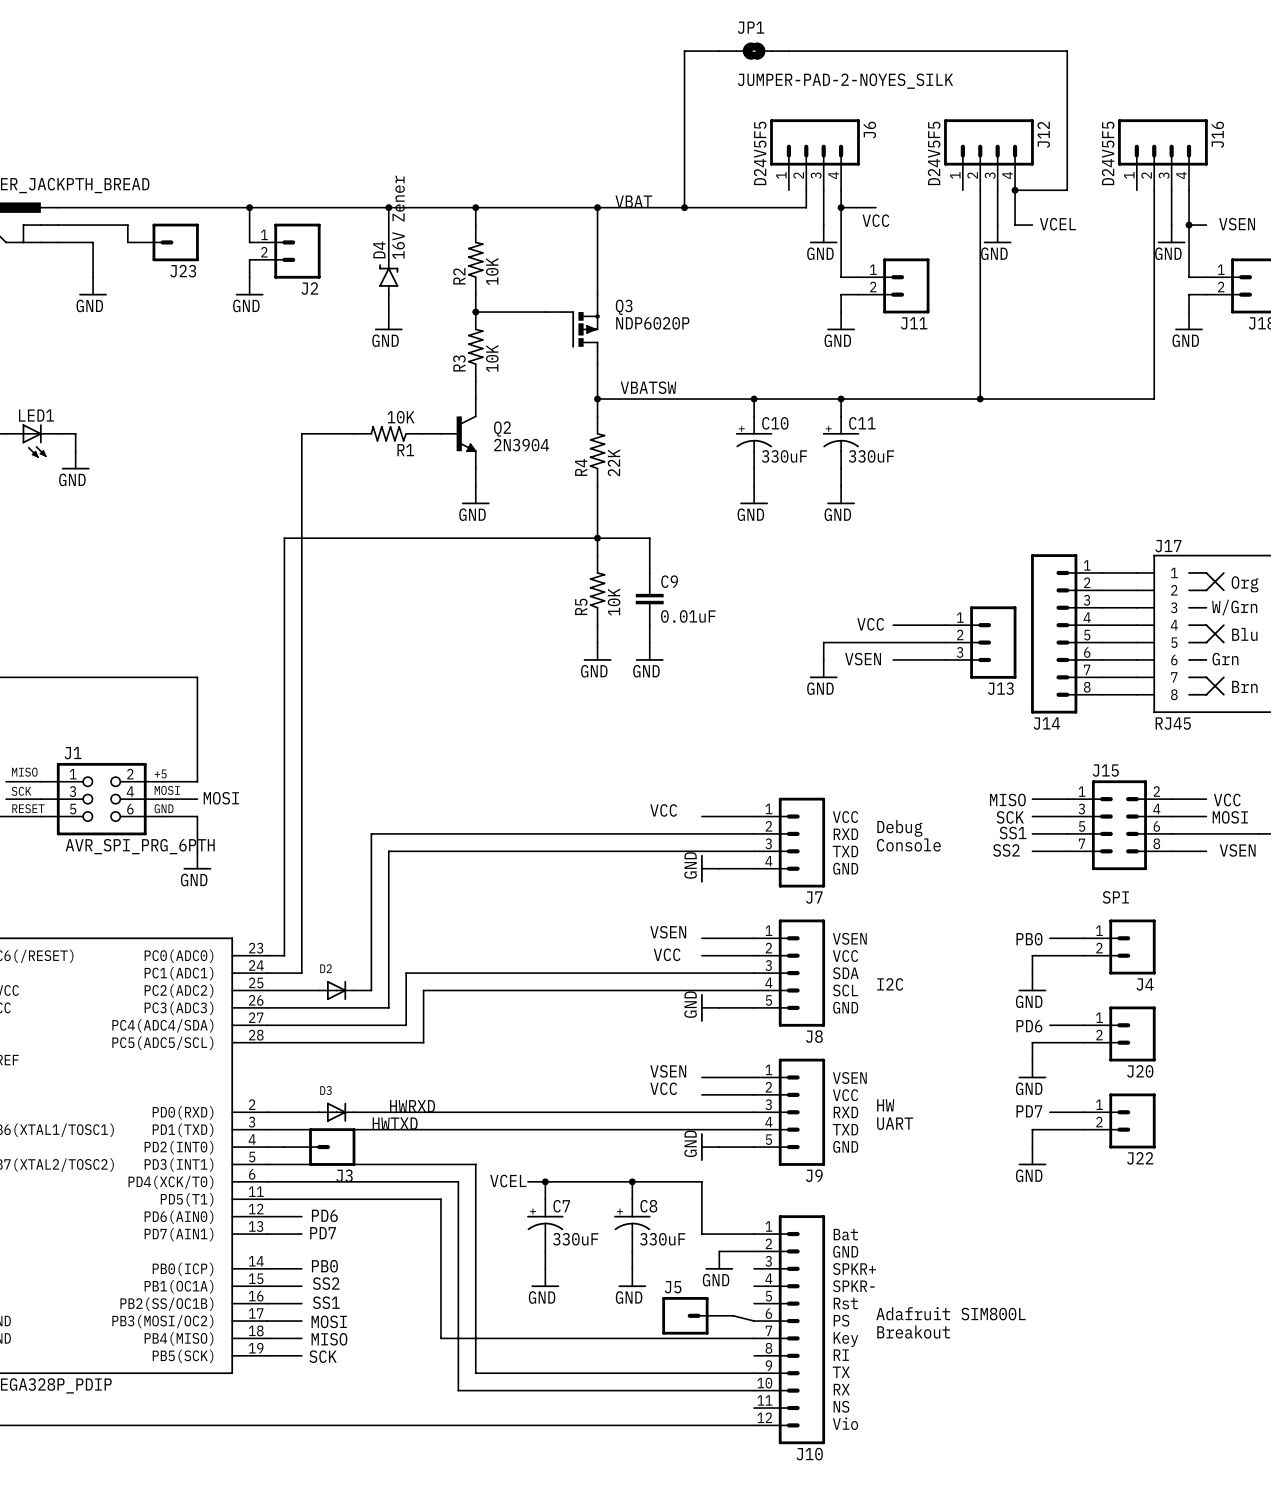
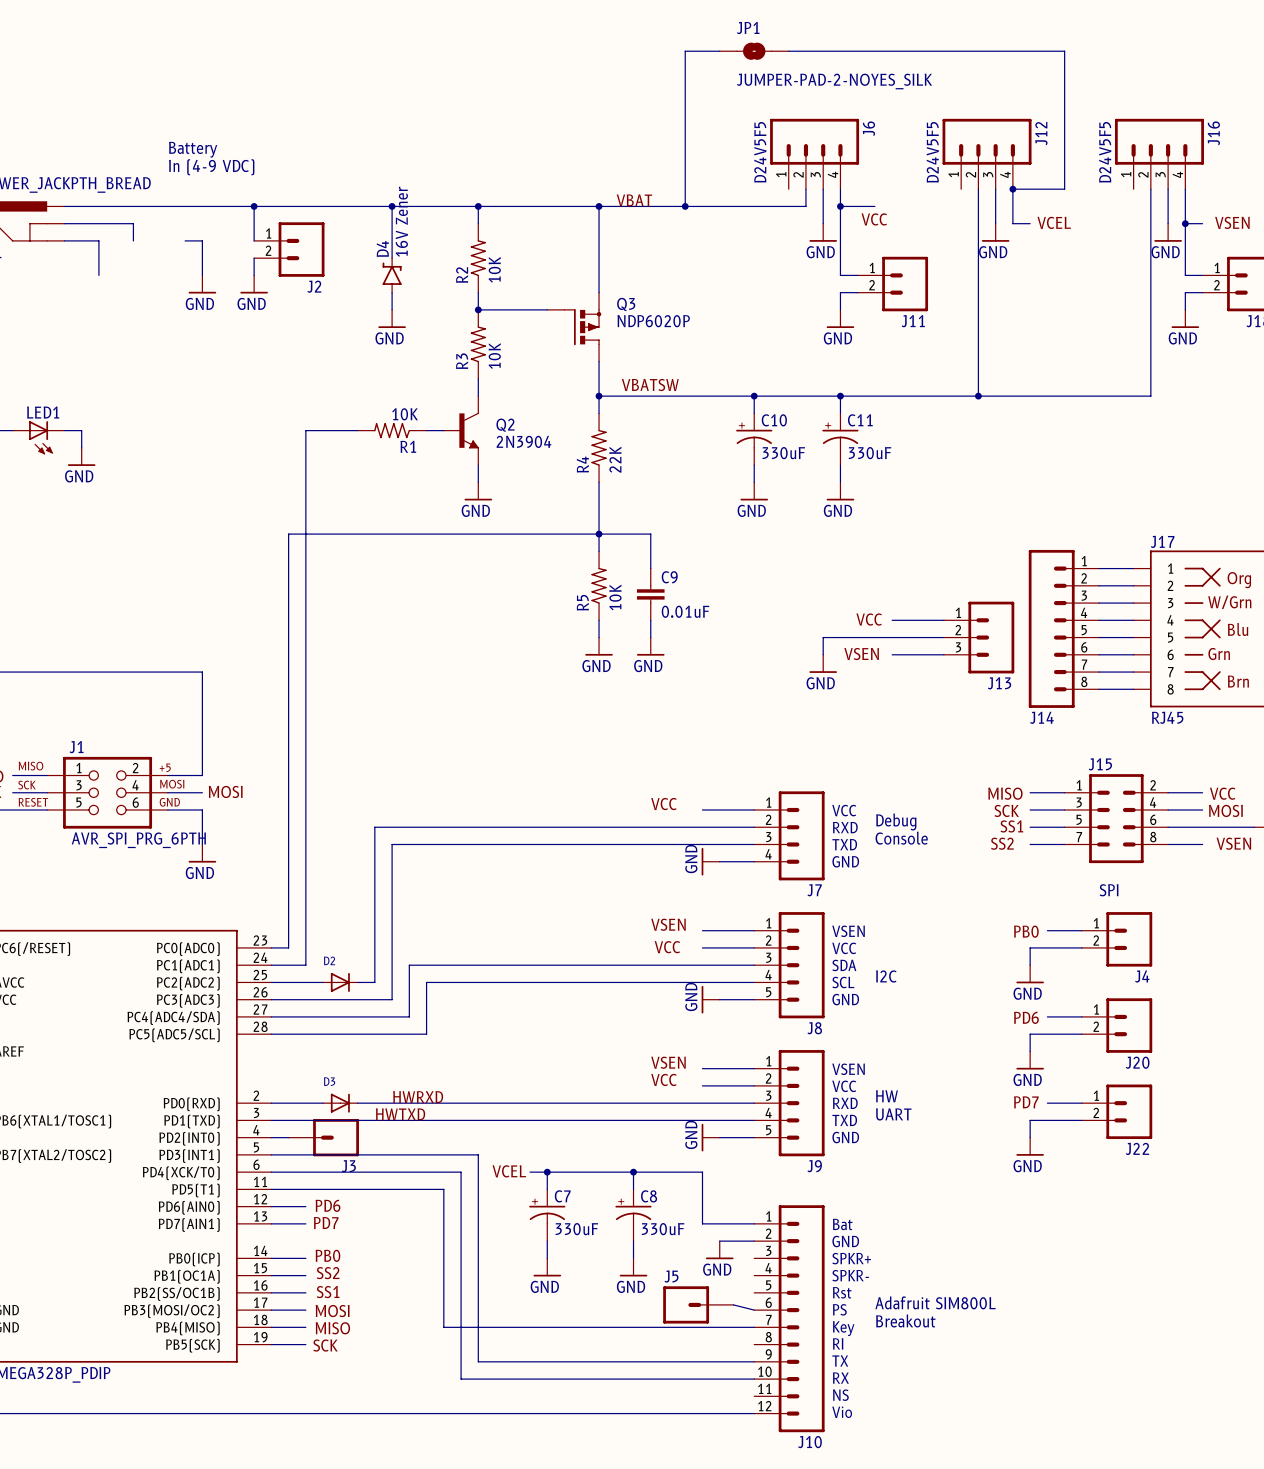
text: none -> Battery (193, 149)
text: none -> In (4-9 VDC) (211, 167)
J23: (163, 242) -> none
wire: none -> (185, 240) (202, 240) (202, 275)
power symbol position: GND (93, 286) -> GND (202, 284)

